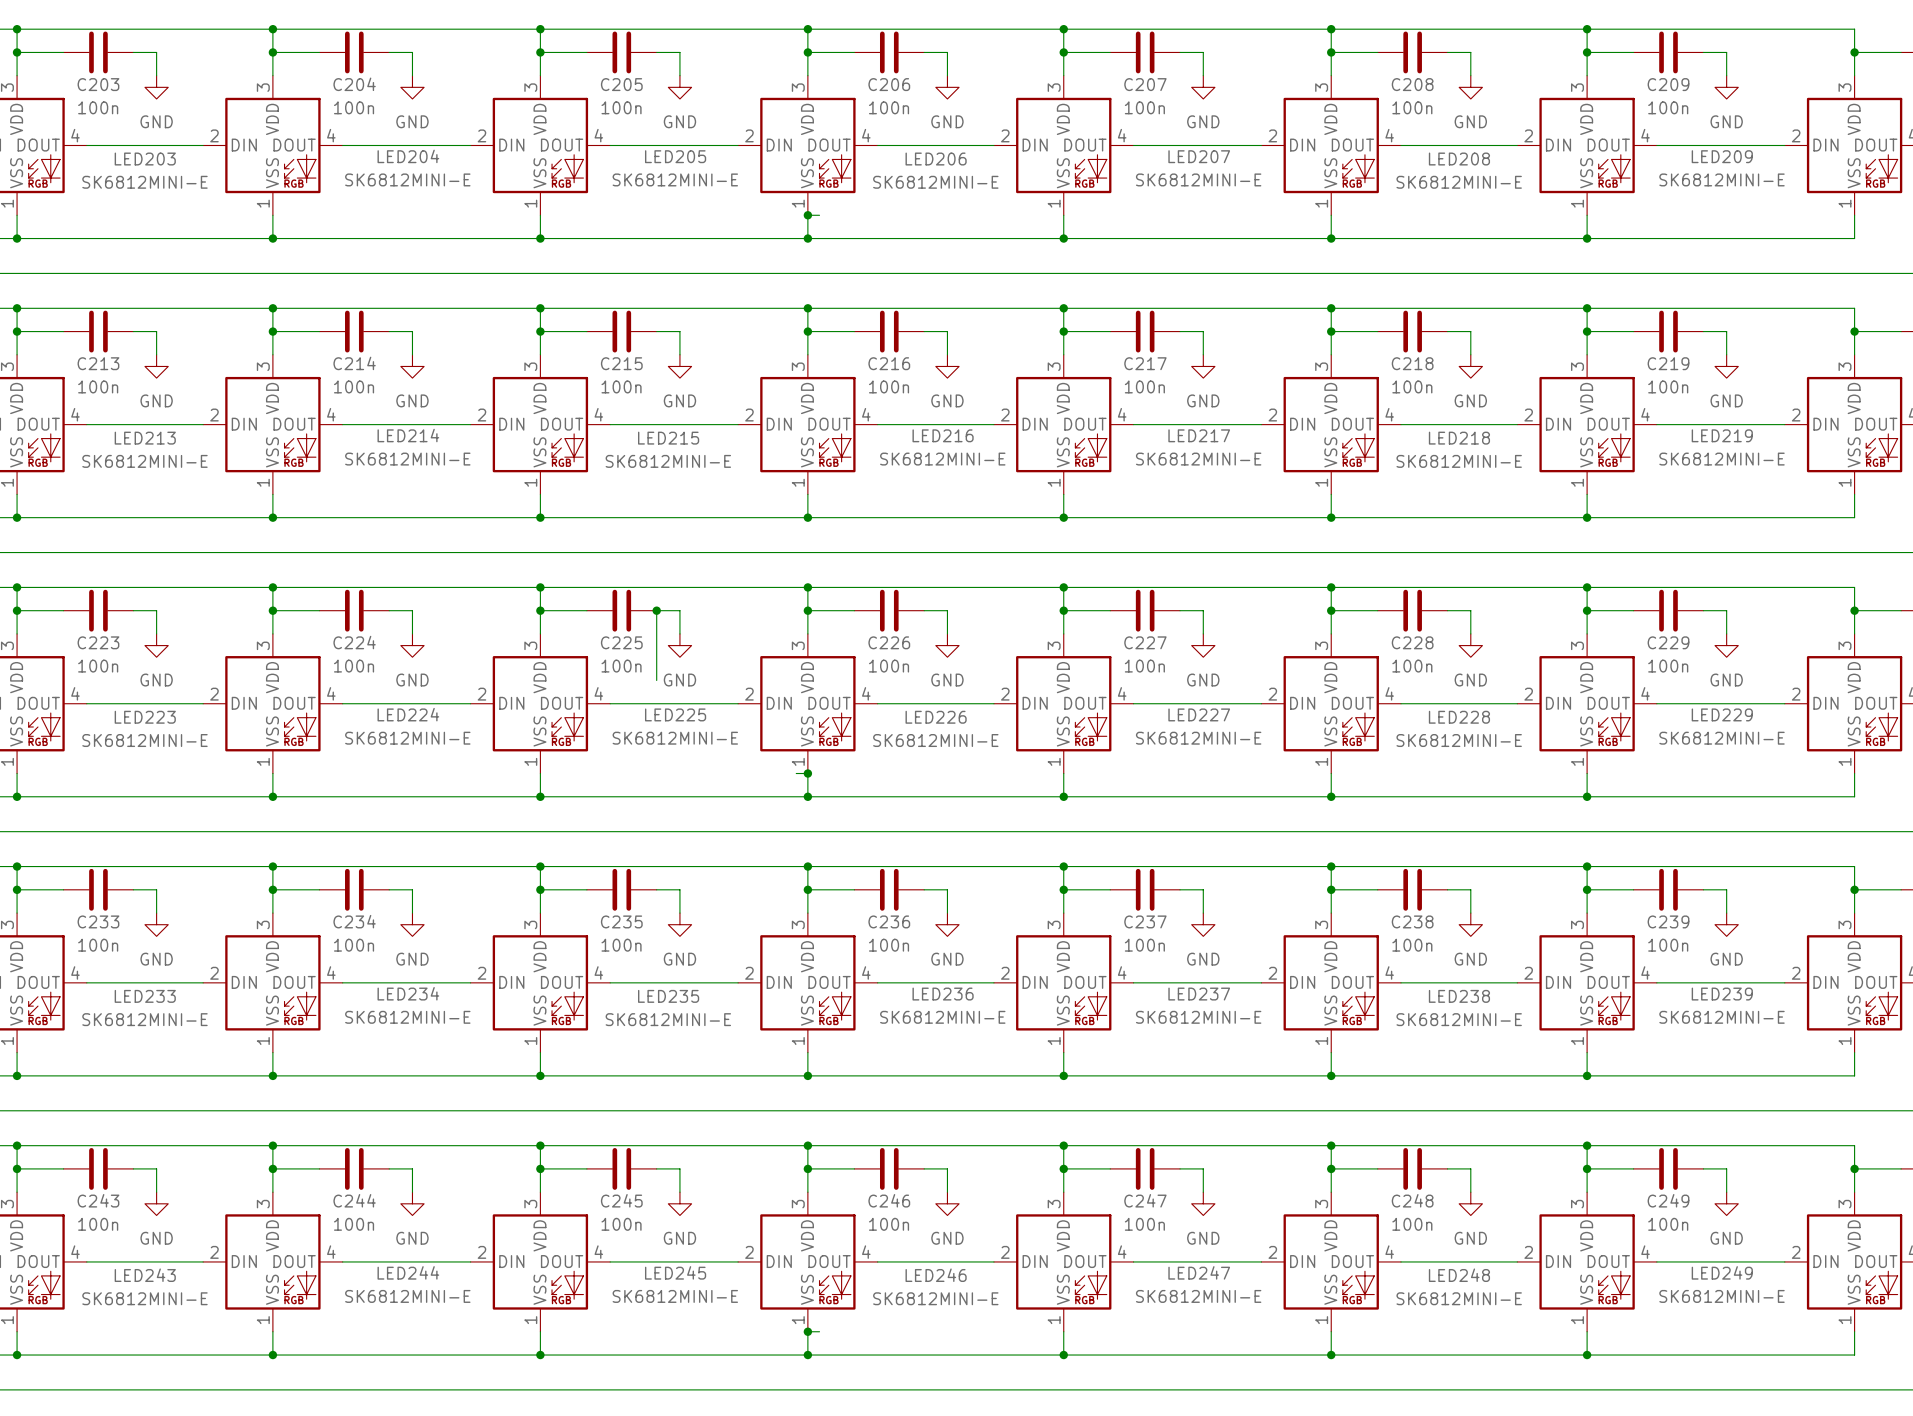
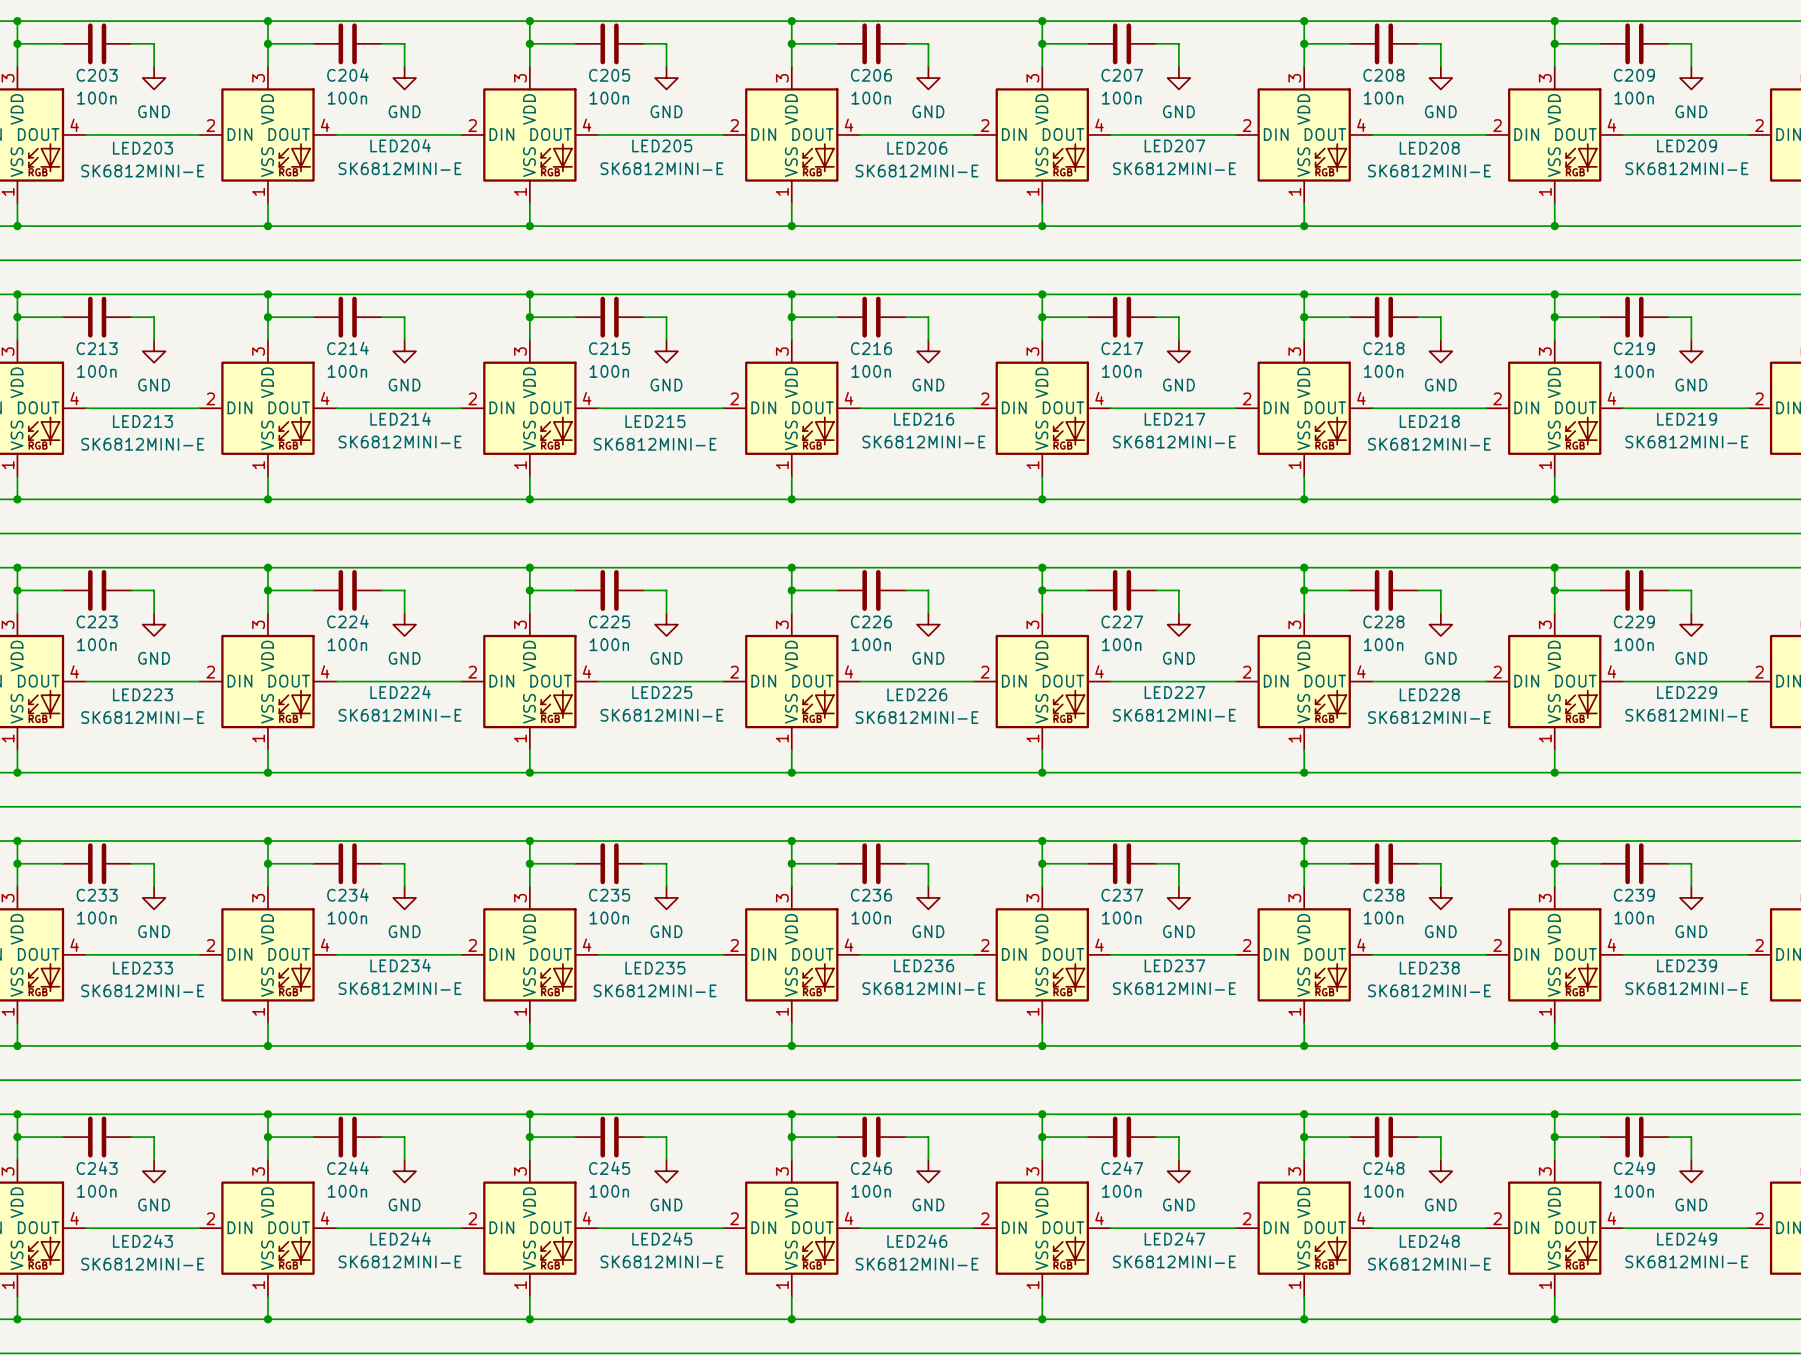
wire: (807, 215) (819, 215) -> none
junction: (807, 215) -> none
wire: (656, 610) (656, 680) -> none
junction: (656, 610) -> none
wire: (796, 773) (807, 773) -> none
junction: (807, 773) -> none
wire: (807, 1331) (819, 1331) -> none
junction: (807, 1331) -> none

